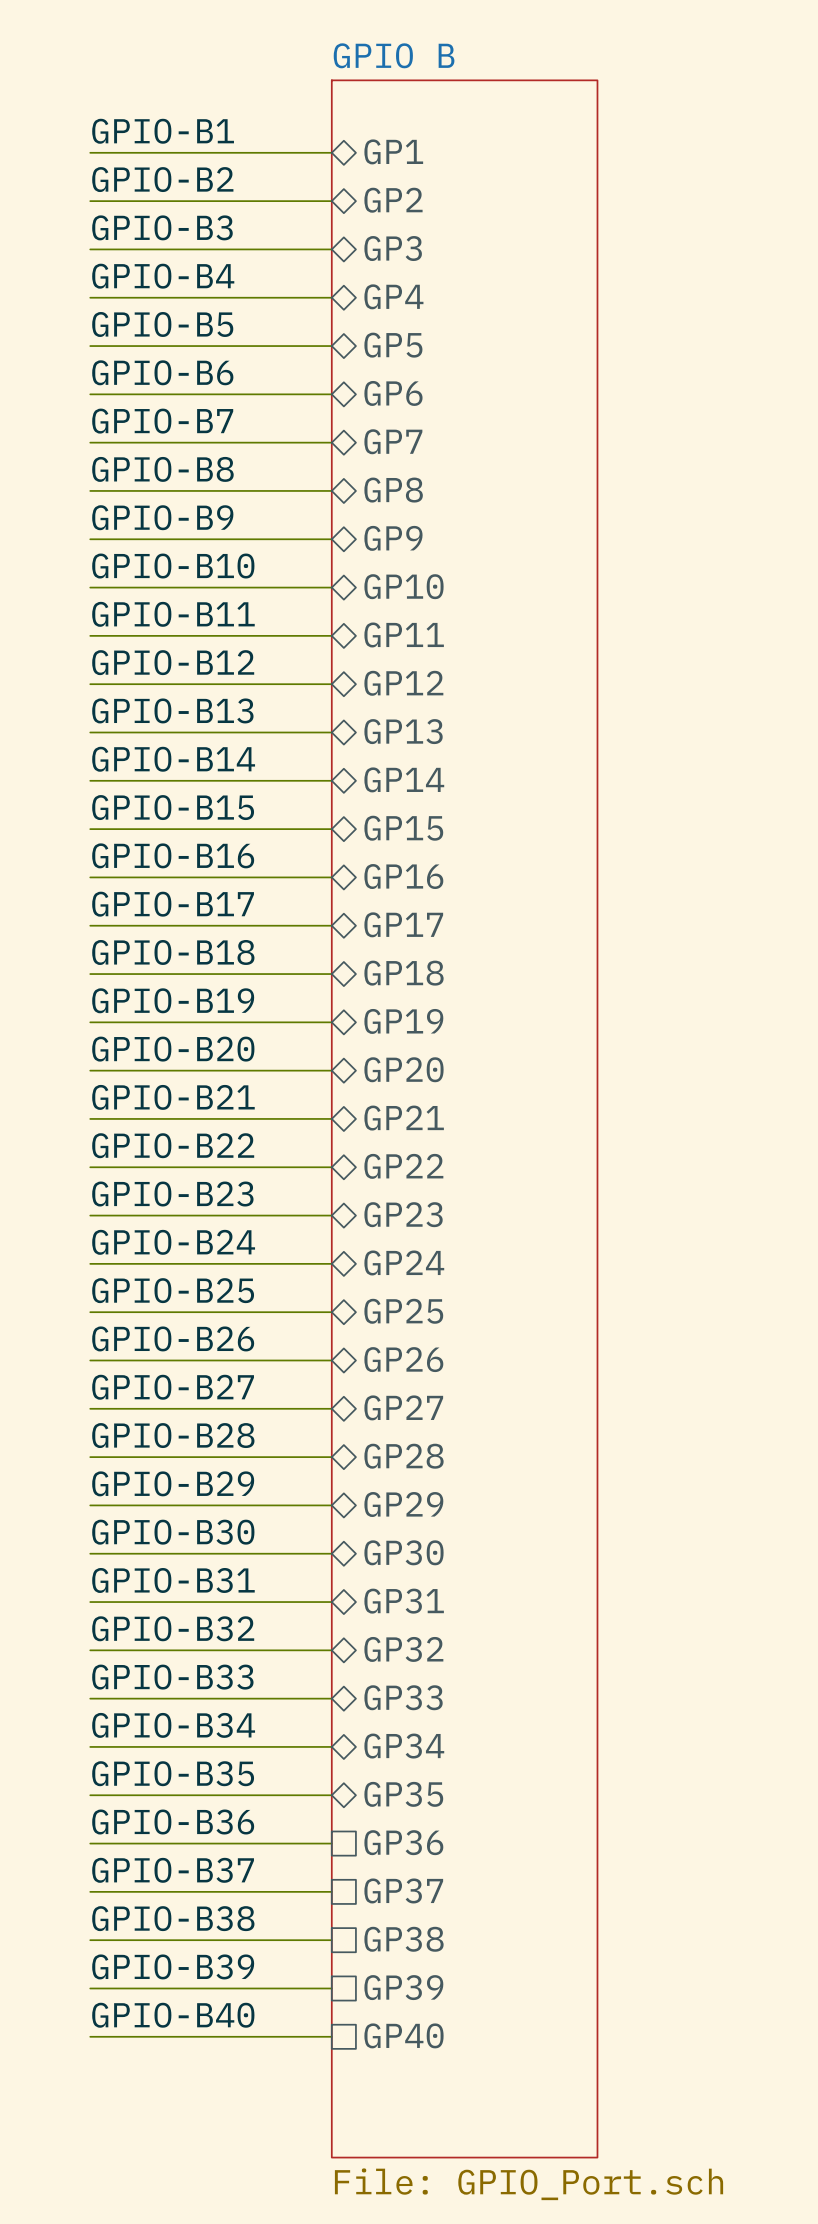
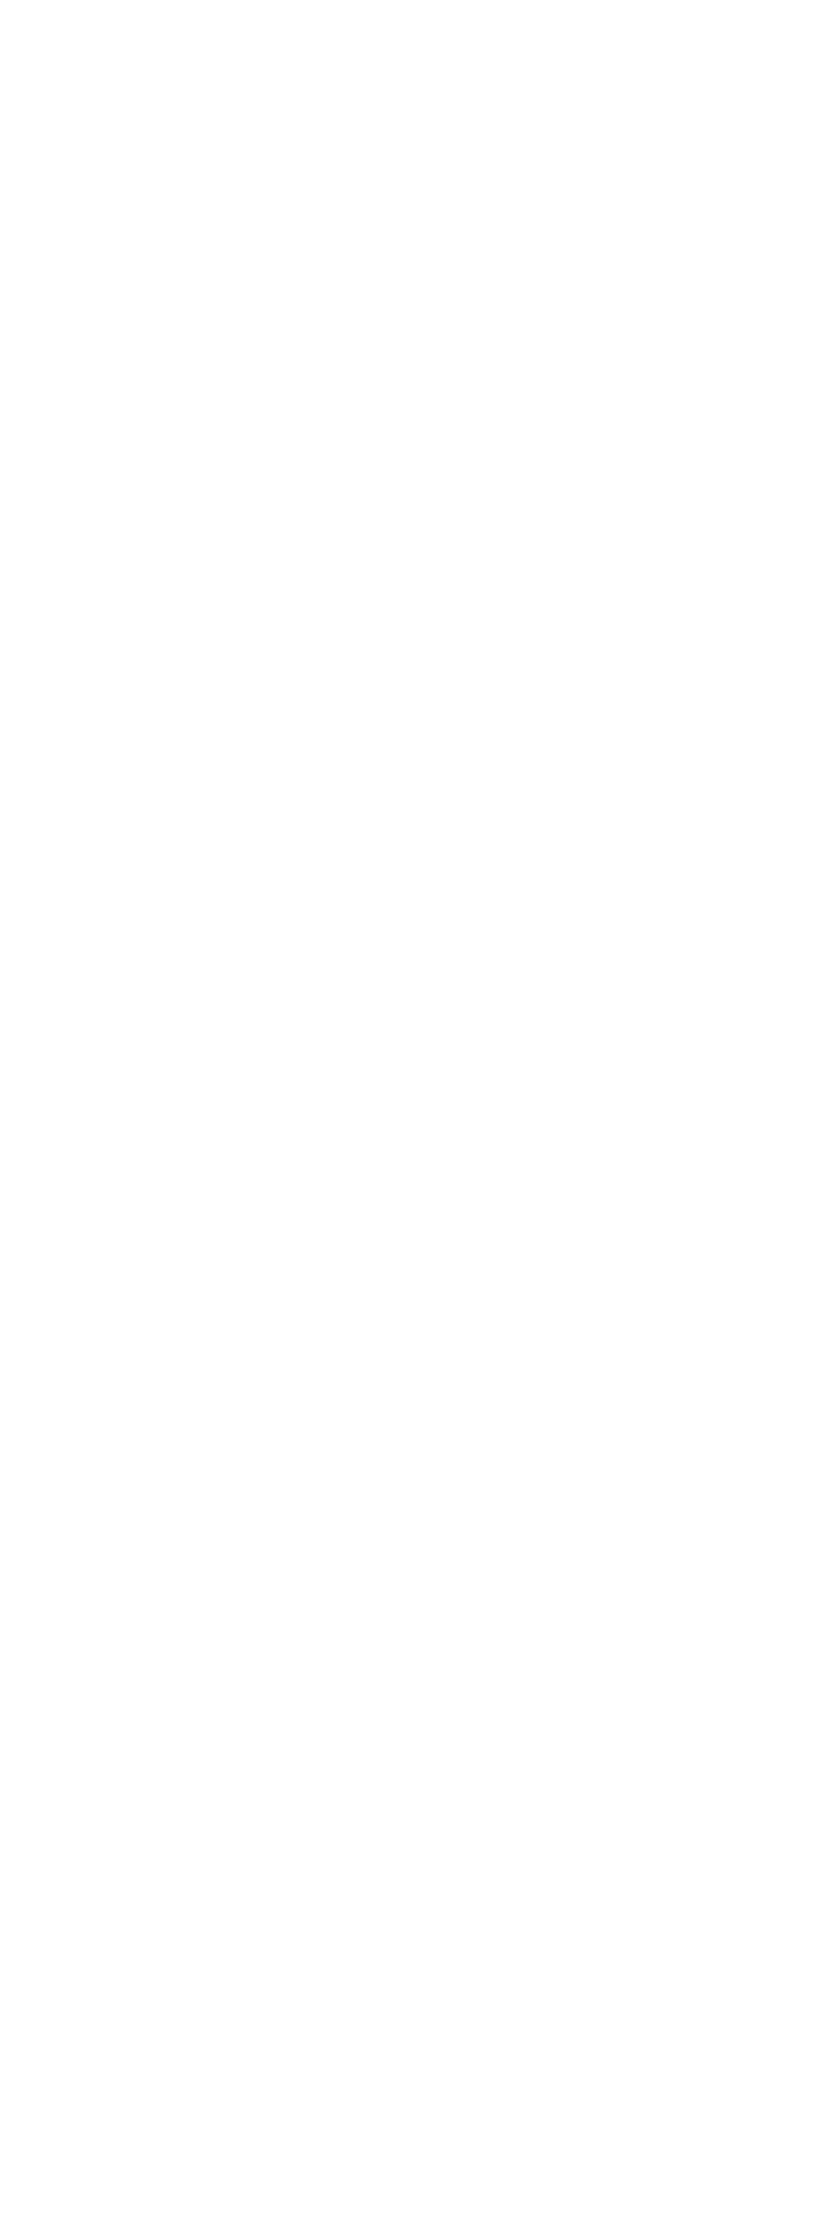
label: GPIO-B1 (163, 131) -> none
sheet pin: GP1 (393, 151) -> none
wire: (90, 152) (331, 152) -> none
label: GPIO-B2 (162, 179) -> none
sheet pin: GP2 (393, 200) -> none
wire: (90, 201) (331, 201) -> none
label: GPIO-B3 (162, 227) -> none
sheet pin: GP3 (393, 248) -> none
wire: (90, 249) (331, 249) -> none
label: GPIO-B4 (163, 276) -> none
sheet pin: GP4 (393, 296) -> none
wire: (90, 297) (331, 297) -> none
label: GPIO-B5 (162, 324) -> none
sheet pin: GP5 (393, 345) -> none
wire: (90, 346) (331, 346) -> none
label: GPIO-B6 (162, 372) -> none
sheet pin: GP6 (393, 393) -> none
wire: (90, 394) (331, 394) -> none
label: GPIO-B7 (162, 421) -> none
sheet pin: GP7 (393, 441) -> none
wire: (90, 442) (331, 442) -> none
label: GPIO-B8 (162, 469) -> none
wire: (90, 490) (331, 490) -> none
sheet pin: GP8 (393, 490) -> none
label: GPIO-B9 (162, 517) -> none
sheet pin: GP9 (393, 538) -> none
wire: (90, 539) (331, 539) -> none
label: GPIO-B10 (173, 566) -> none
sheet pin: GP10 (403, 586) -> none
wire: (90, 587) (331, 587) -> none
label: GPIO-B11 (173, 614) -> none
sheet pin: GP11 (404, 634) -> none
wire: (90, 635) (331, 635) -> none
label: GPIO-B12 (173, 662) -> none
sheet pin: GP12 (403, 683) -> none
wire: (90, 684) (331, 684) -> none
label: GPIO-B13 (172, 710) -> none
sheet pin: GP13 (403, 731) -> none
wire: (90, 732) (331, 732) -> none
label: GPIO-B14 (173, 759) -> none
sheet pin: GP14 (404, 779) -> none
wire: (90, 780) (331, 780) -> none
label: GPIO-B15 (173, 807) -> none
sheet pin: GP15 (403, 828) -> none
wire: (90, 829) (331, 829) -> none
label: GPIO-B16 (173, 855) -> none
sheet pin: GP16 (403, 876) -> none
wire: (90, 877) (331, 877) -> none
label: GPIO-B17 (173, 904) -> none
sheet pin: GP17 (403, 924) -> none
wire: (90, 925) (331, 925) -> none
label: GPIO-B18 (173, 952) -> none
sheet pin: GP18 (404, 973) -> none
wire: (90, 974) (331, 974) -> none
label: GPIO-B19 (173, 1000) -> none
sheet pin: GP19 (403, 1021) -> none
wire: (90, 1022) (331, 1022) -> none
label: GPIO-B20 (173, 1049) -> none
sheet pin: GP20 (403, 1069) -> none
wire: (90, 1070) (331, 1070) -> none
label: GPIO-B21 (173, 1097) -> none
wire: (90, 1118) (331, 1118) -> none
sheet pin: GP21 (404, 1118) -> none
sheet GPIO B: File: GPIO_Port.sch (464, 1118) -> none
label: GPIO-B22 (173, 1145) -> none
sheet pin: GP22 (403, 1166) -> none
wire: (90, 1167) (331, 1167) -> none
label: GPIO-B23 (172, 1194) -> none
sheet pin: GP23 (403, 1214) -> none
wire: (90, 1215) (331, 1215) -> none
label: GPIO-B24 (173, 1242) -> none
sheet pin: GP24 (404, 1262) -> none
wire: (90, 1263) (331, 1263) -> none
label: GPIO-B25 (173, 1290) -> none
sheet pin: GP25 (403, 1311) -> none
wire: (90, 1312) (331, 1312) -> none
label: GPIO-B26 (173, 1338) -> none
sheet pin: GP26 (403, 1359) -> none
wire: (90, 1360) (331, 1360) -> none
label: GPIO-B27 (173, 1387) -> none
sheet pin: GP27 (403, 1407) -> none
wire: (90, 1408) (331, 1408) -> none
label: GPIO-B28 (173, 1435) -> none
sheet pin: GP28 (404, 1456) -> none
wire: (90, 1457) (331, 1457) -> none
label: GPIO-B29 (173, 1483) -> none
sheet pin: GP29 (403, 1504) -> none
wire: (90, 1505) (331, 1505) -> none
label: GPIO-B30 (173, 1532) -> none
sheet pin: GP30 (403, 1552) -> none
wire: (90, 1553) (331, 1553) -> none
label: GPIO-B31 (173, 1580) -> none
sheet pin: GP31 (404, 1601) -> none
wire: (90, 1602) (331, 1602) -> none
label: GPIO-B32 (173, 1628) -> none
sheet pin: GP32 (403, 1649) -> none
wire: (90, 1650) (331, 1650) -> none
label: GPIO-B33 (172, 1677) -> none
sheet pin: GP33 (403, 1697) -> none
wire: (90, 1698) (331, 1698) -> none
label: GPIO-B34 (173, 1725) -> none
wire: (90, 1746) (331, 1746) -> none
sheet pin: GP34 (404, 1746) -> none
label: GPIO-B35 (173, 1773) -> none
sheet pin: GP35 (403, 1794) -> none
wire: (90, 1795) (331, 1795) -> none
label: GPIO-B36 (173, 1822) -> none
sheet pin: GP36 (403, 1842) -> none
wire: (90, 1843) (331, 1843) -> none
label: GPIO-B37 (173, 1870) -> none
sheet pin: GP37 (403, 1890) -> none
wire: (90, 1891) (331, 1891) -> none
label: GPIO-B38 (173, 1918) -> none
sheet pin: GP38 (404, 1939) -> none
wire: (90, 1940) (331, 1940) -> none
label: GPIO-B39 (173, 1966) -> none
sheet pin: GP39 (403, 1987) -> none
wire: (90, 1988) (331, 1988) -> none
label: GPIO-B40 (173, 2015) -> none
sheet pin: GP40 (403, 2035) -> none
wire: (90, 2036) (331, 2036) -> none

